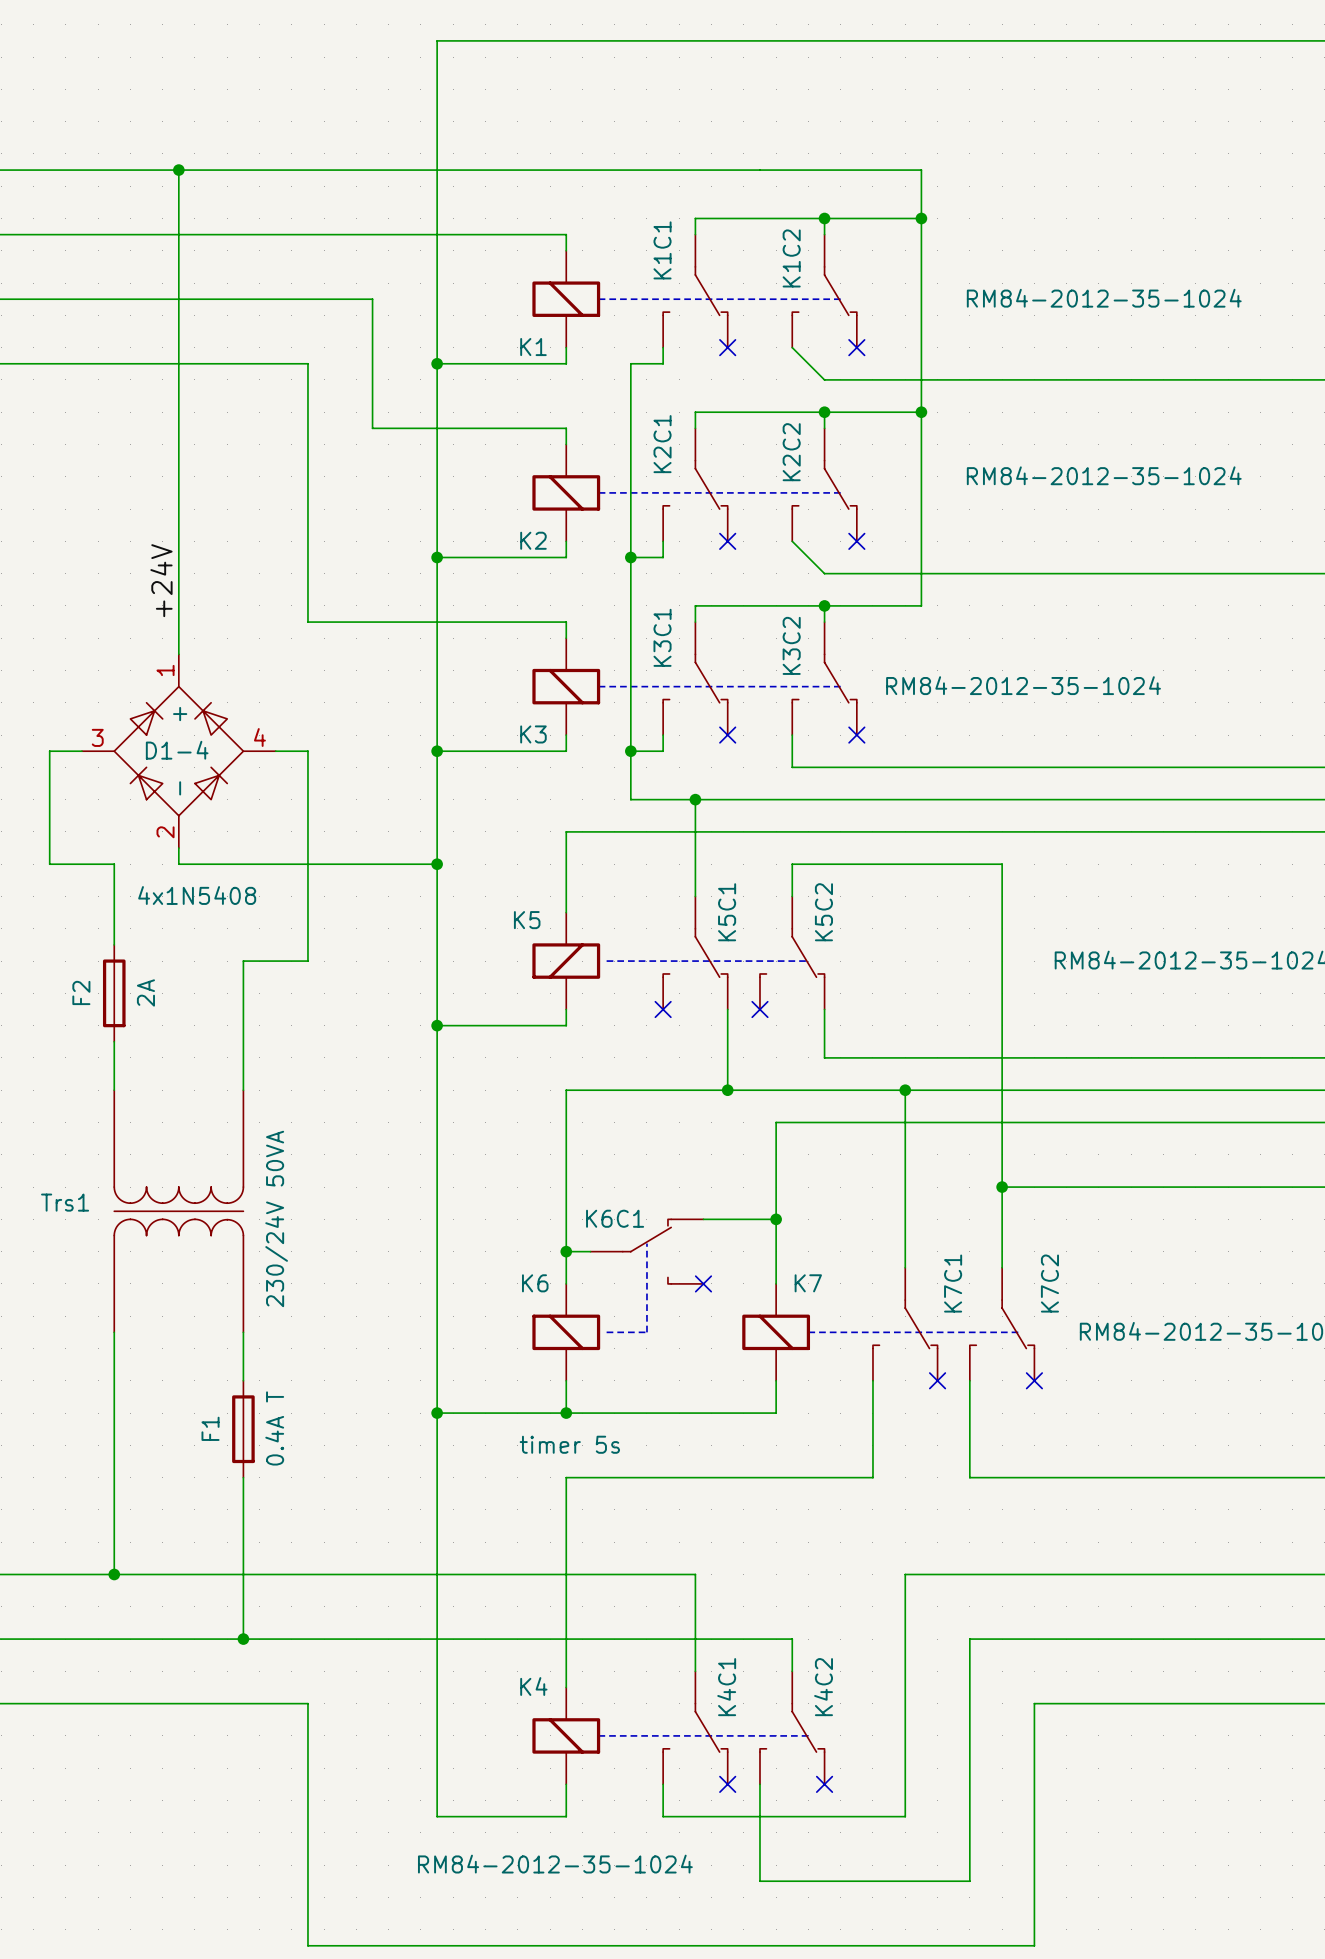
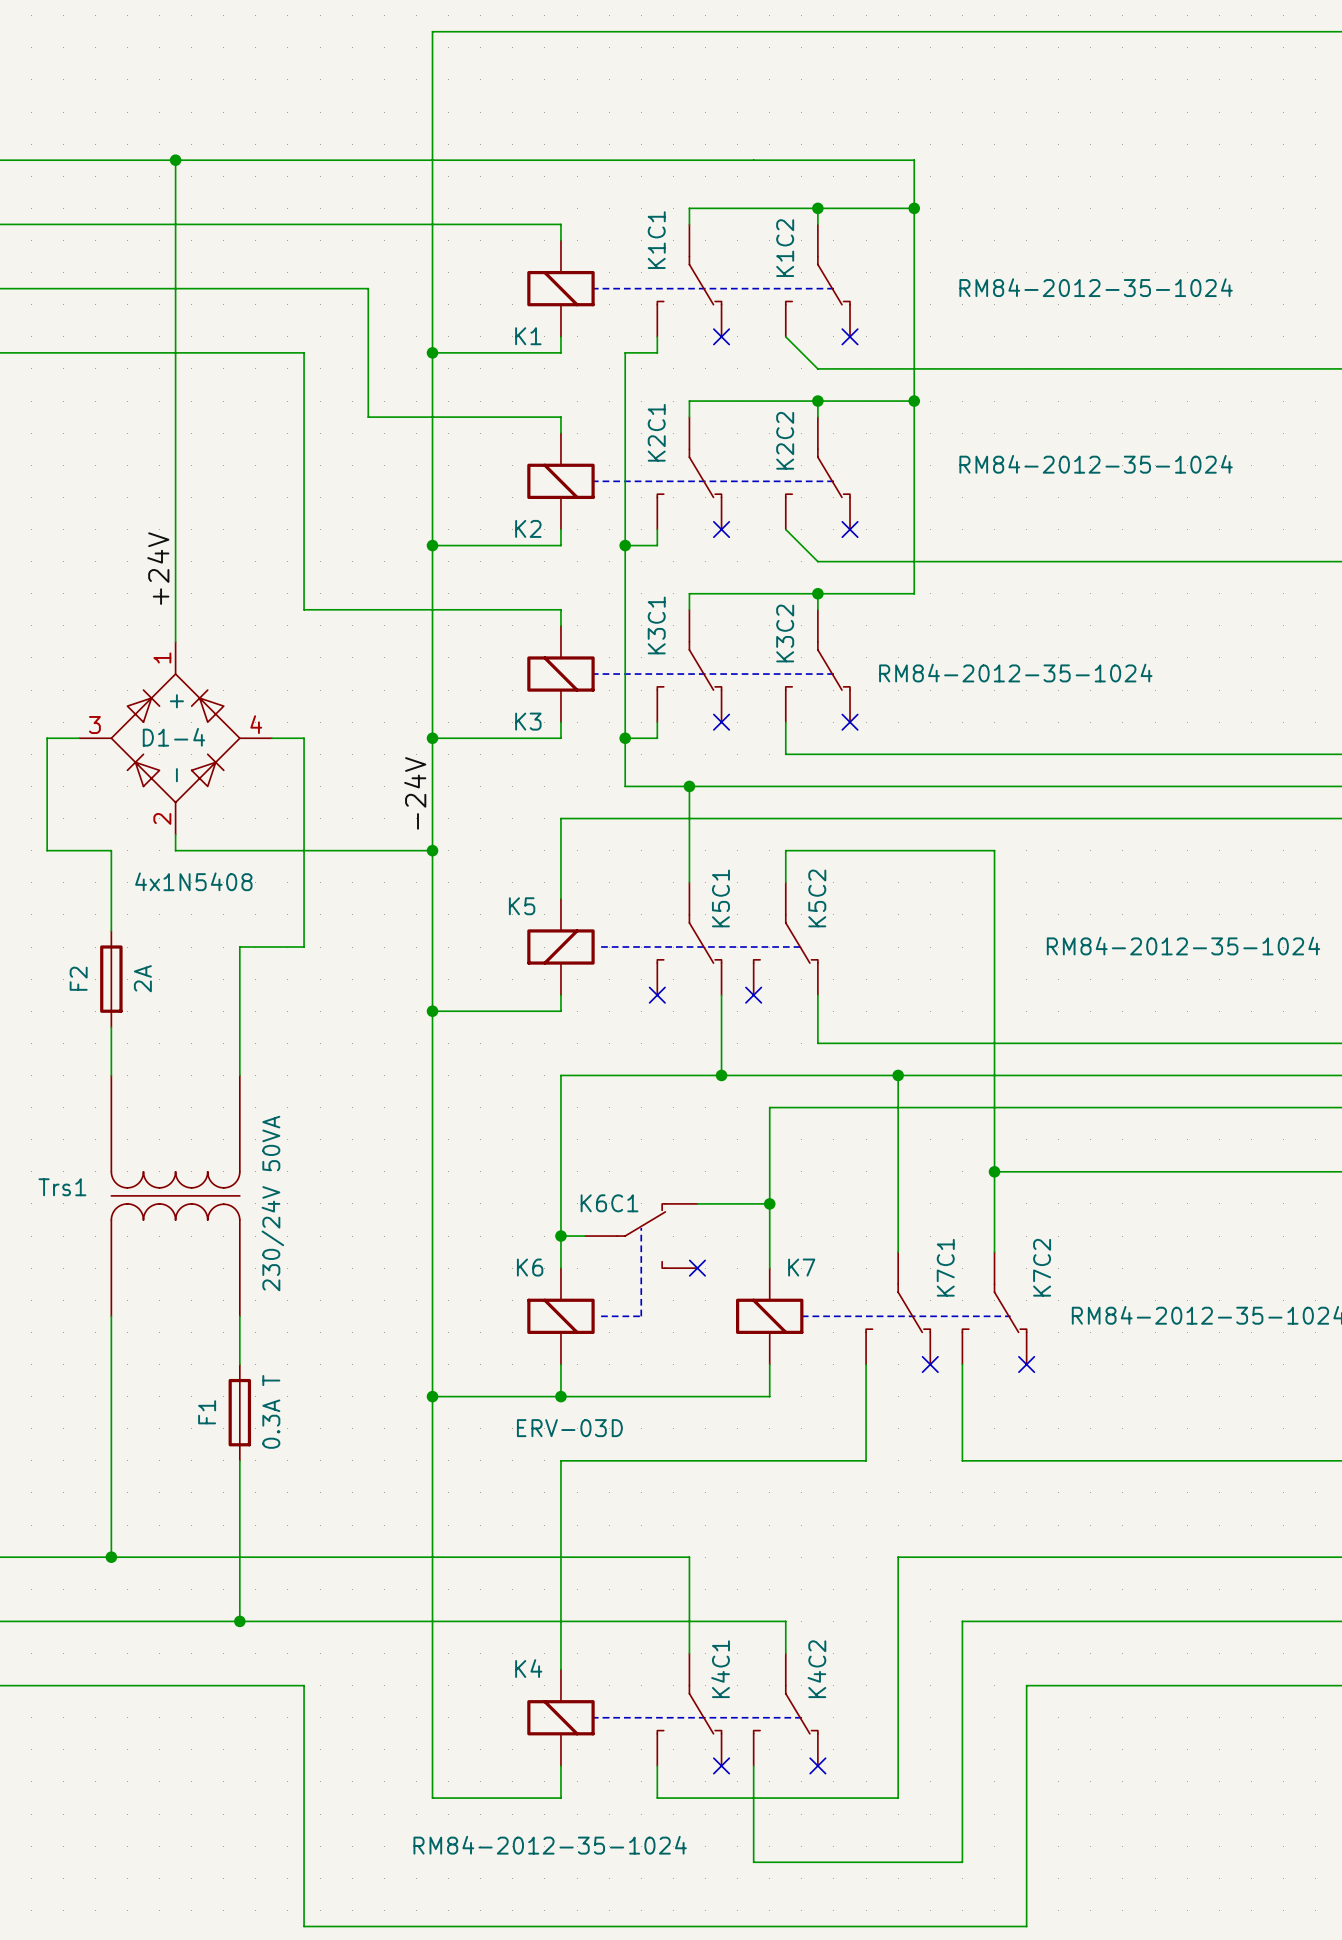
label: none -> -24V (415, 793)
F1 value: 0.4A T (274, 1428) -> 0.3A T (271, 1411)
K6 value: timer 5s (569, 1444) -> ERV-03D (569, 1428)

